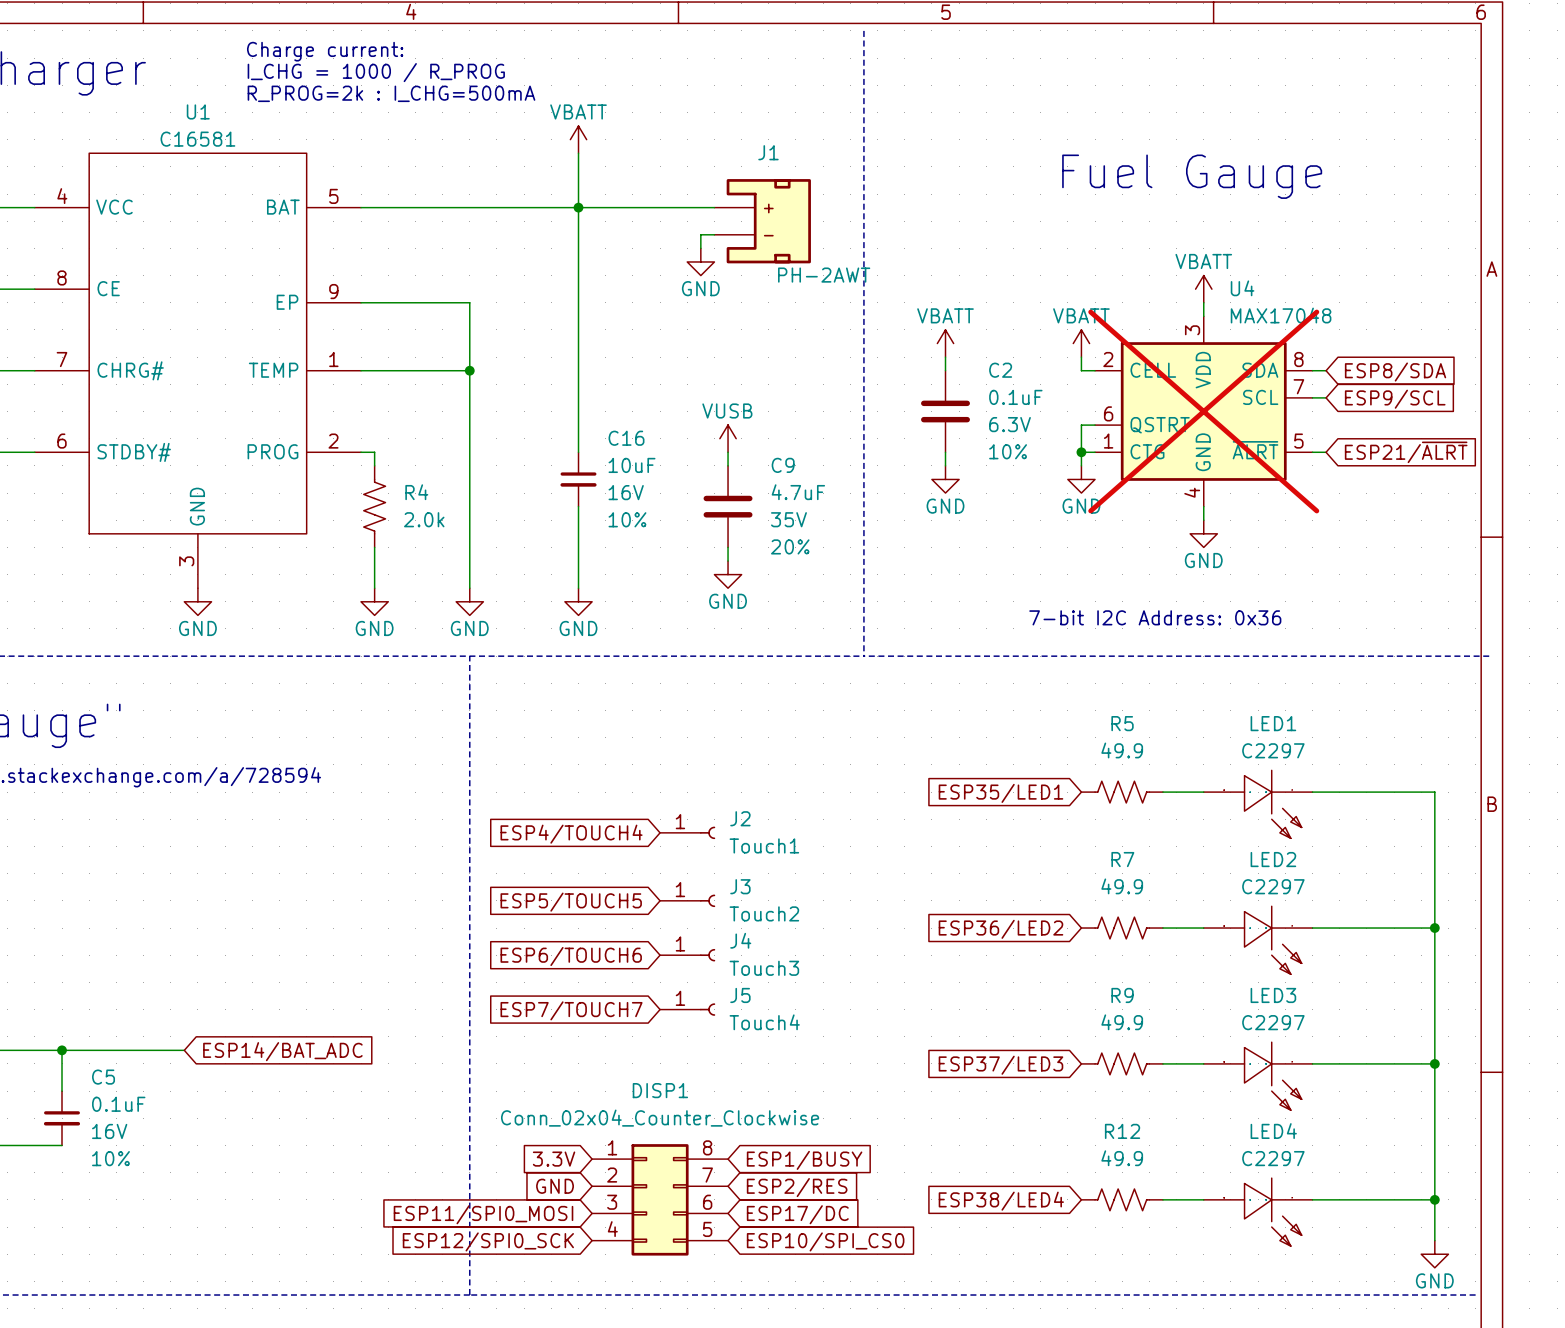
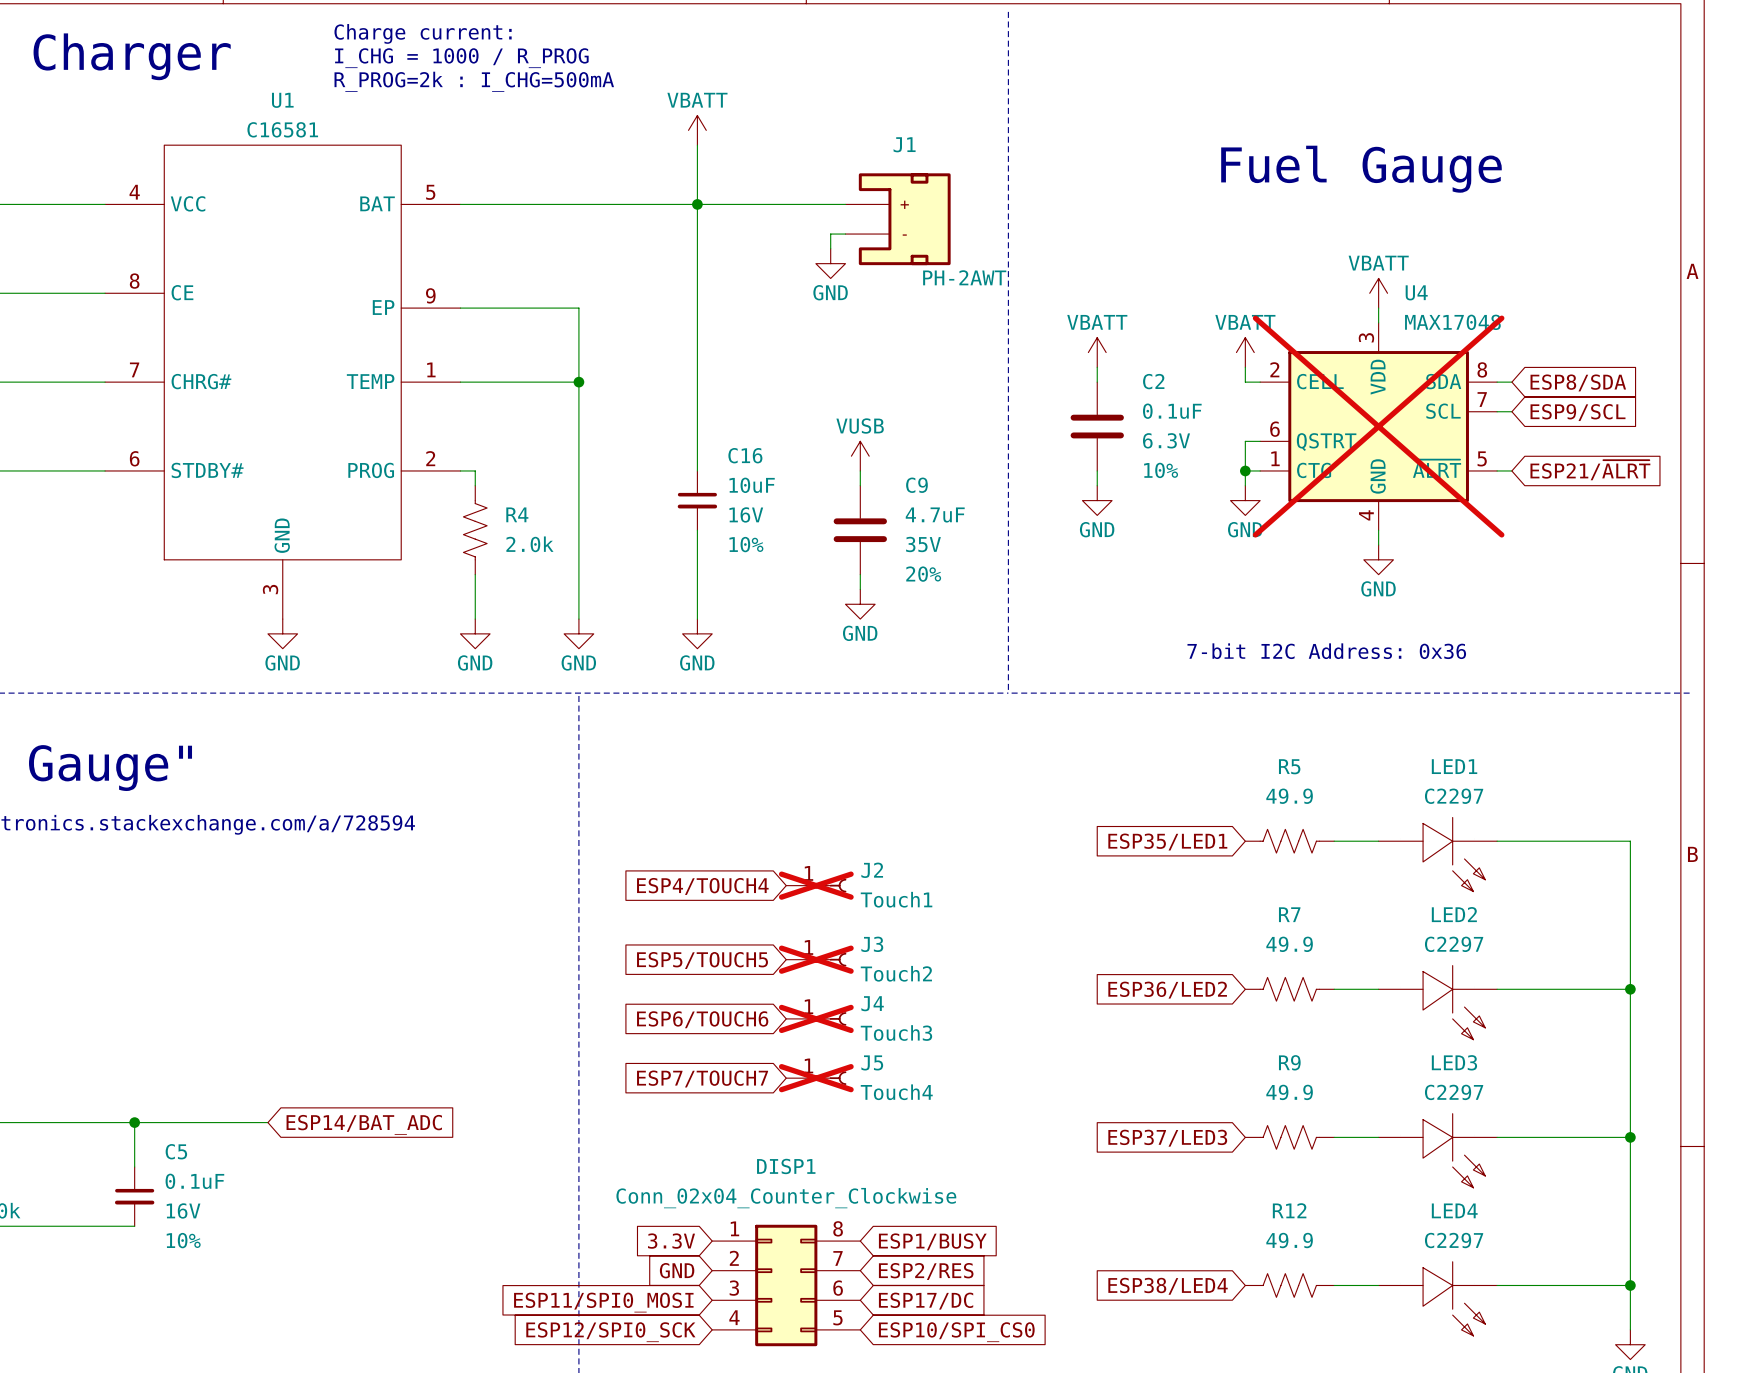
J2 do-not-place cross: none -> (816, 885)
J3 do-not-place cross: none -> (816, 959)
J4 do-not-place cross: none -> (816, 1018)
J5 do-not-place cross: none -> (816, 1078)

